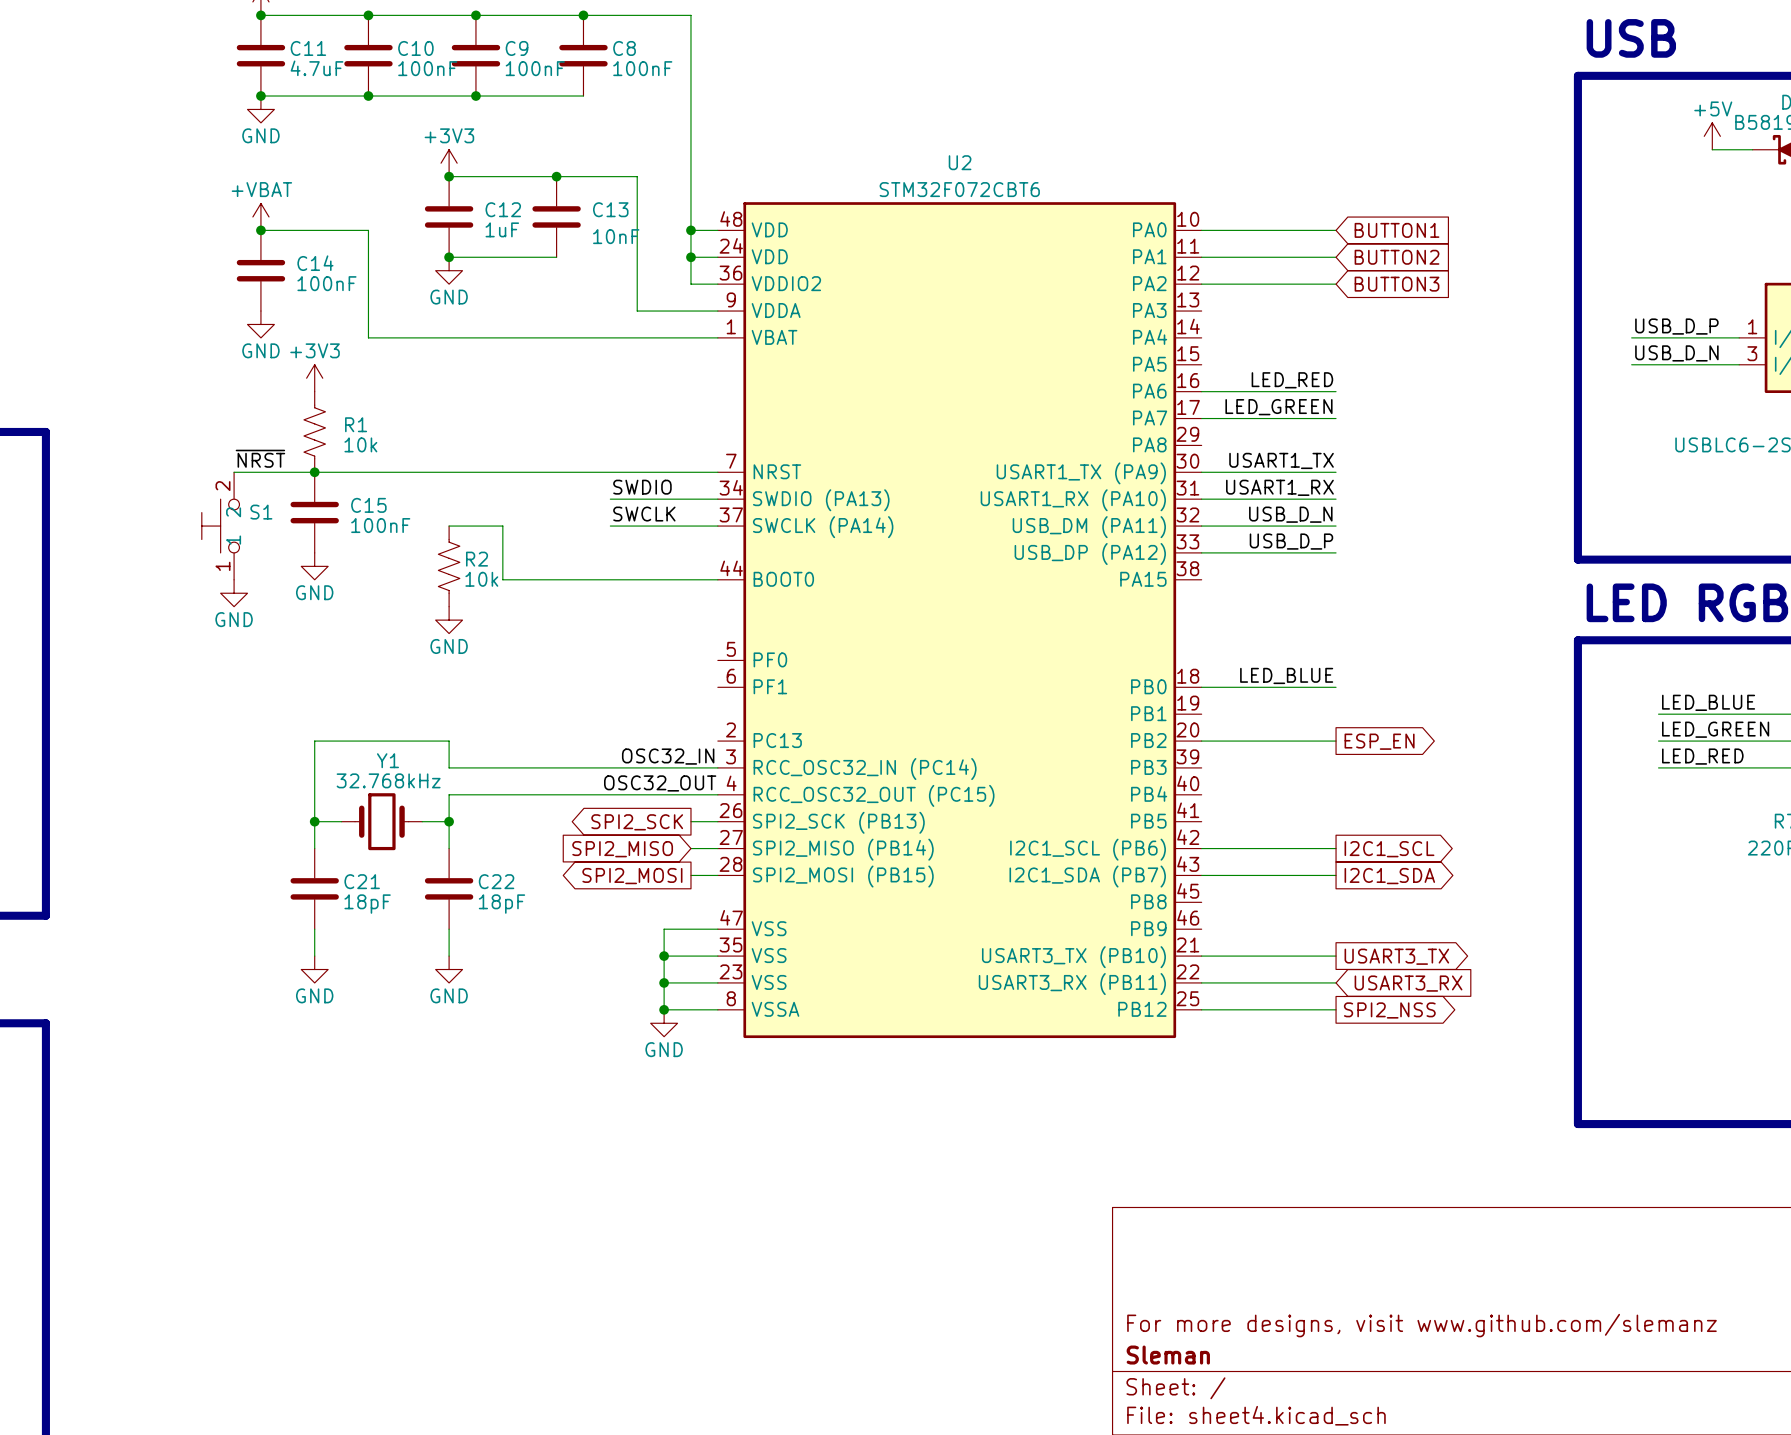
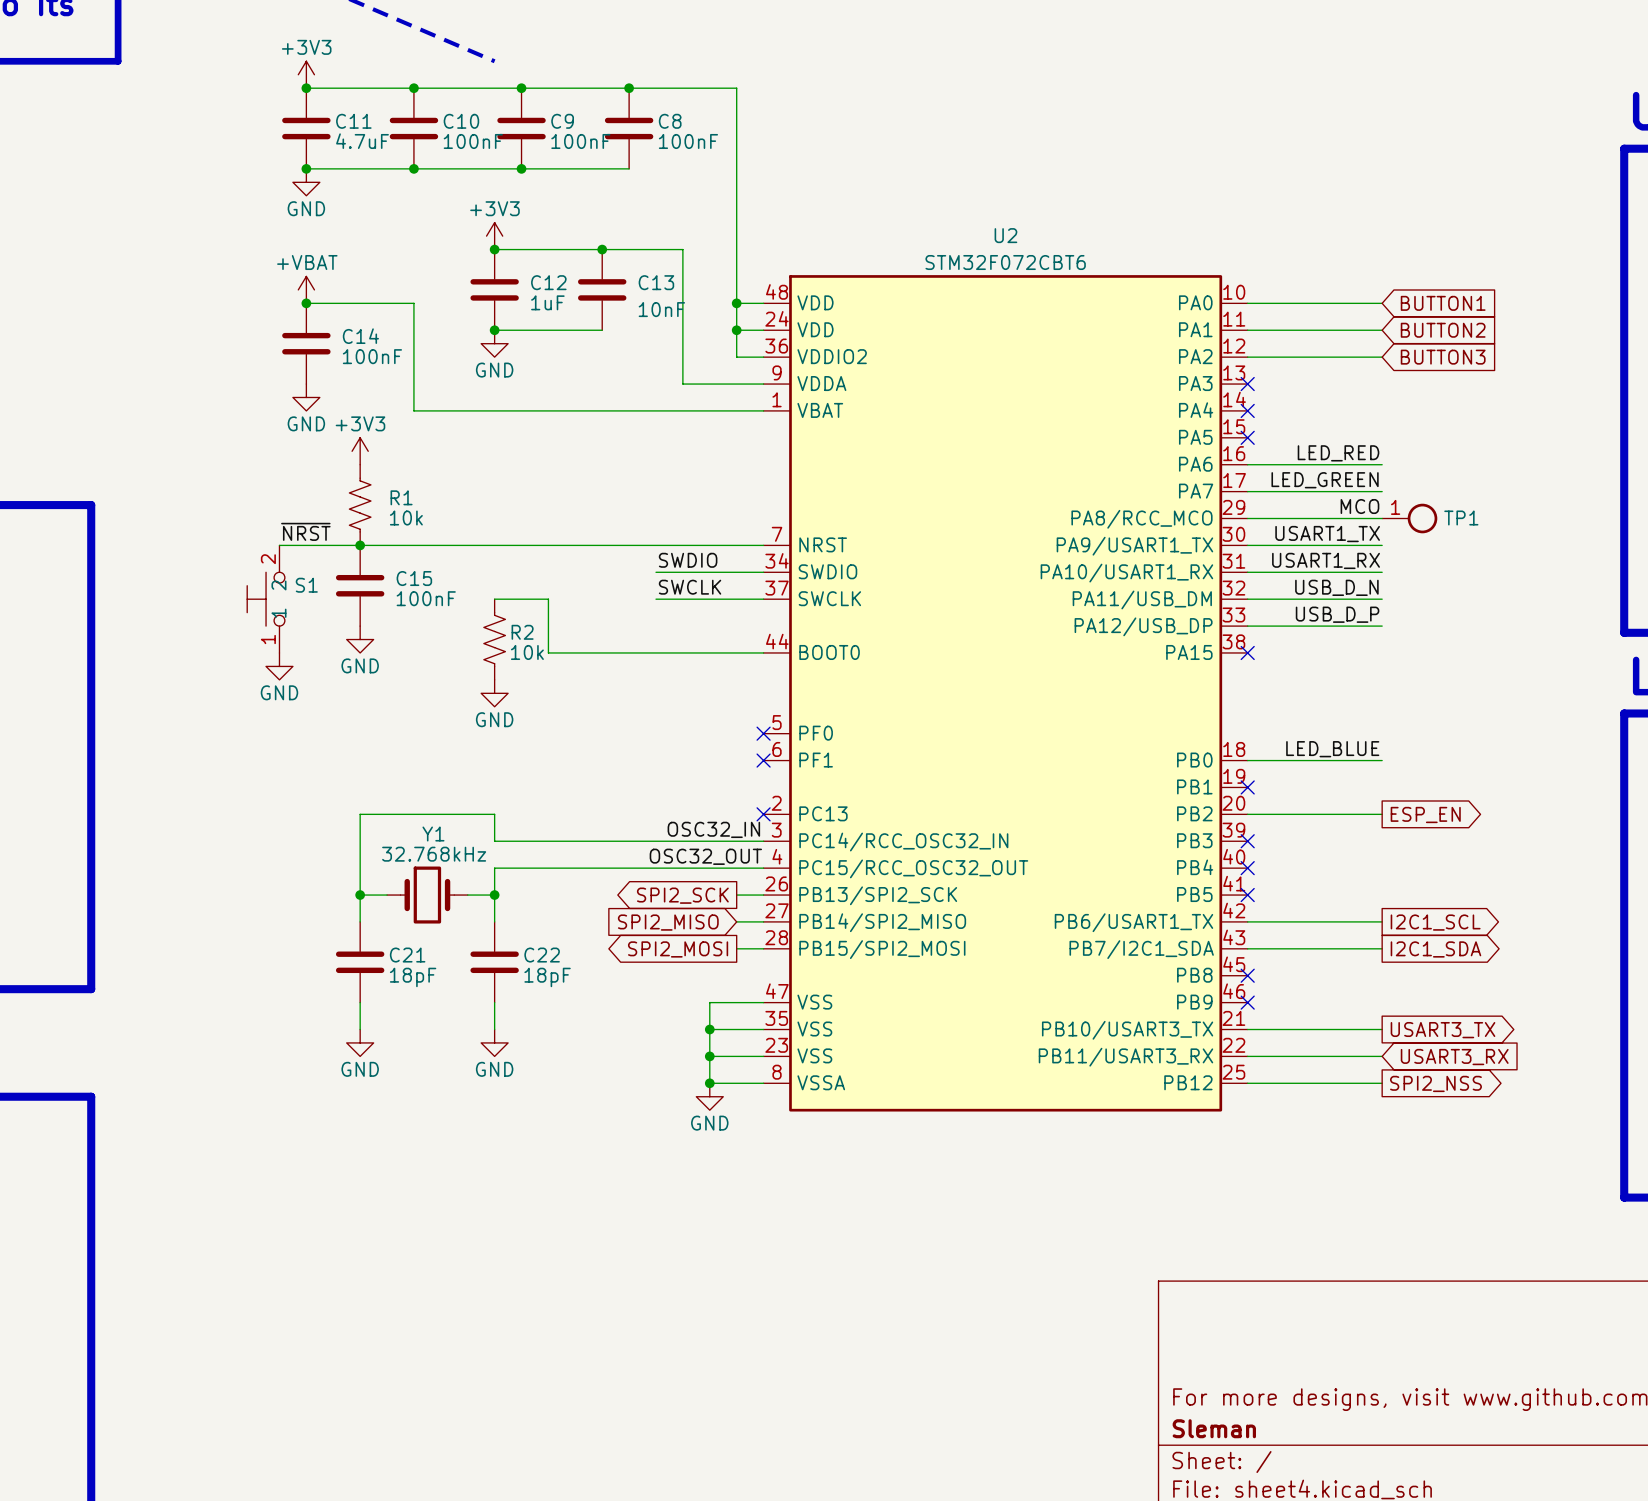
U2 symbol: [717, 202, 1202, 1039] -> [763, 275, 1248, 1112]
no-connect mark: none -> (1247, 384)
no-connect mark: none -> (1247, 410)
no-connect mark: none -> (1247, 437)
label: none -> MCO (1359, 506)
wire: none -> (1247, 518) (1382, 518)
TP1: none -> (1409, 518)
no-connect mark: none -> (1247, 652)
no-connect mark: none -> (763, 733)
no-connect mark: none -> (763, 760)
no-connect mark: none -> (1247, 787)
no-connect mark: none -> (763, 814)
no-connect mark: none -> (1247, 841)
no-connect mark: none -> (1247, 868)
no-connect mark: none -> (1247, 895)
no-connect mark: none -> (1247, 975)
no-connect mark: none -> (1247, 1002)

